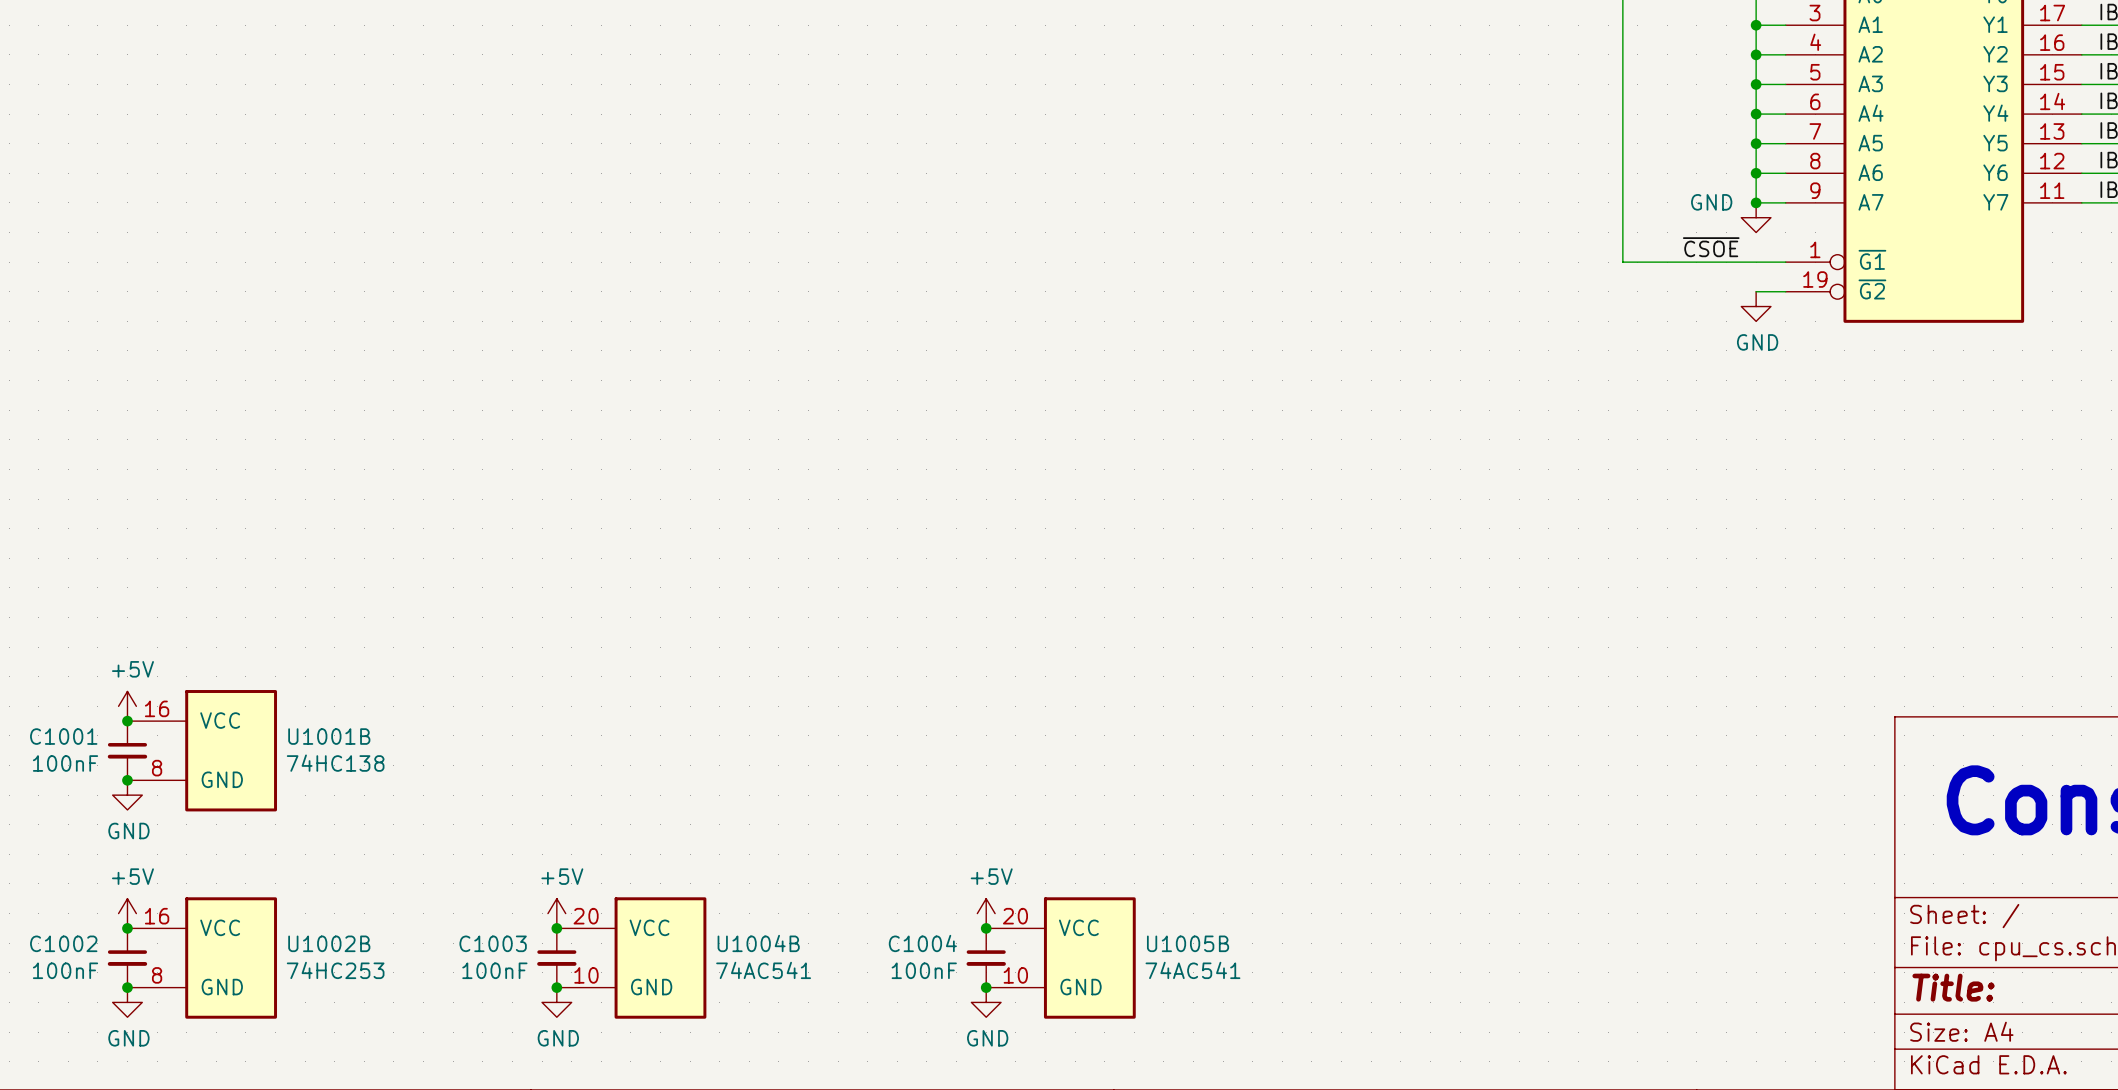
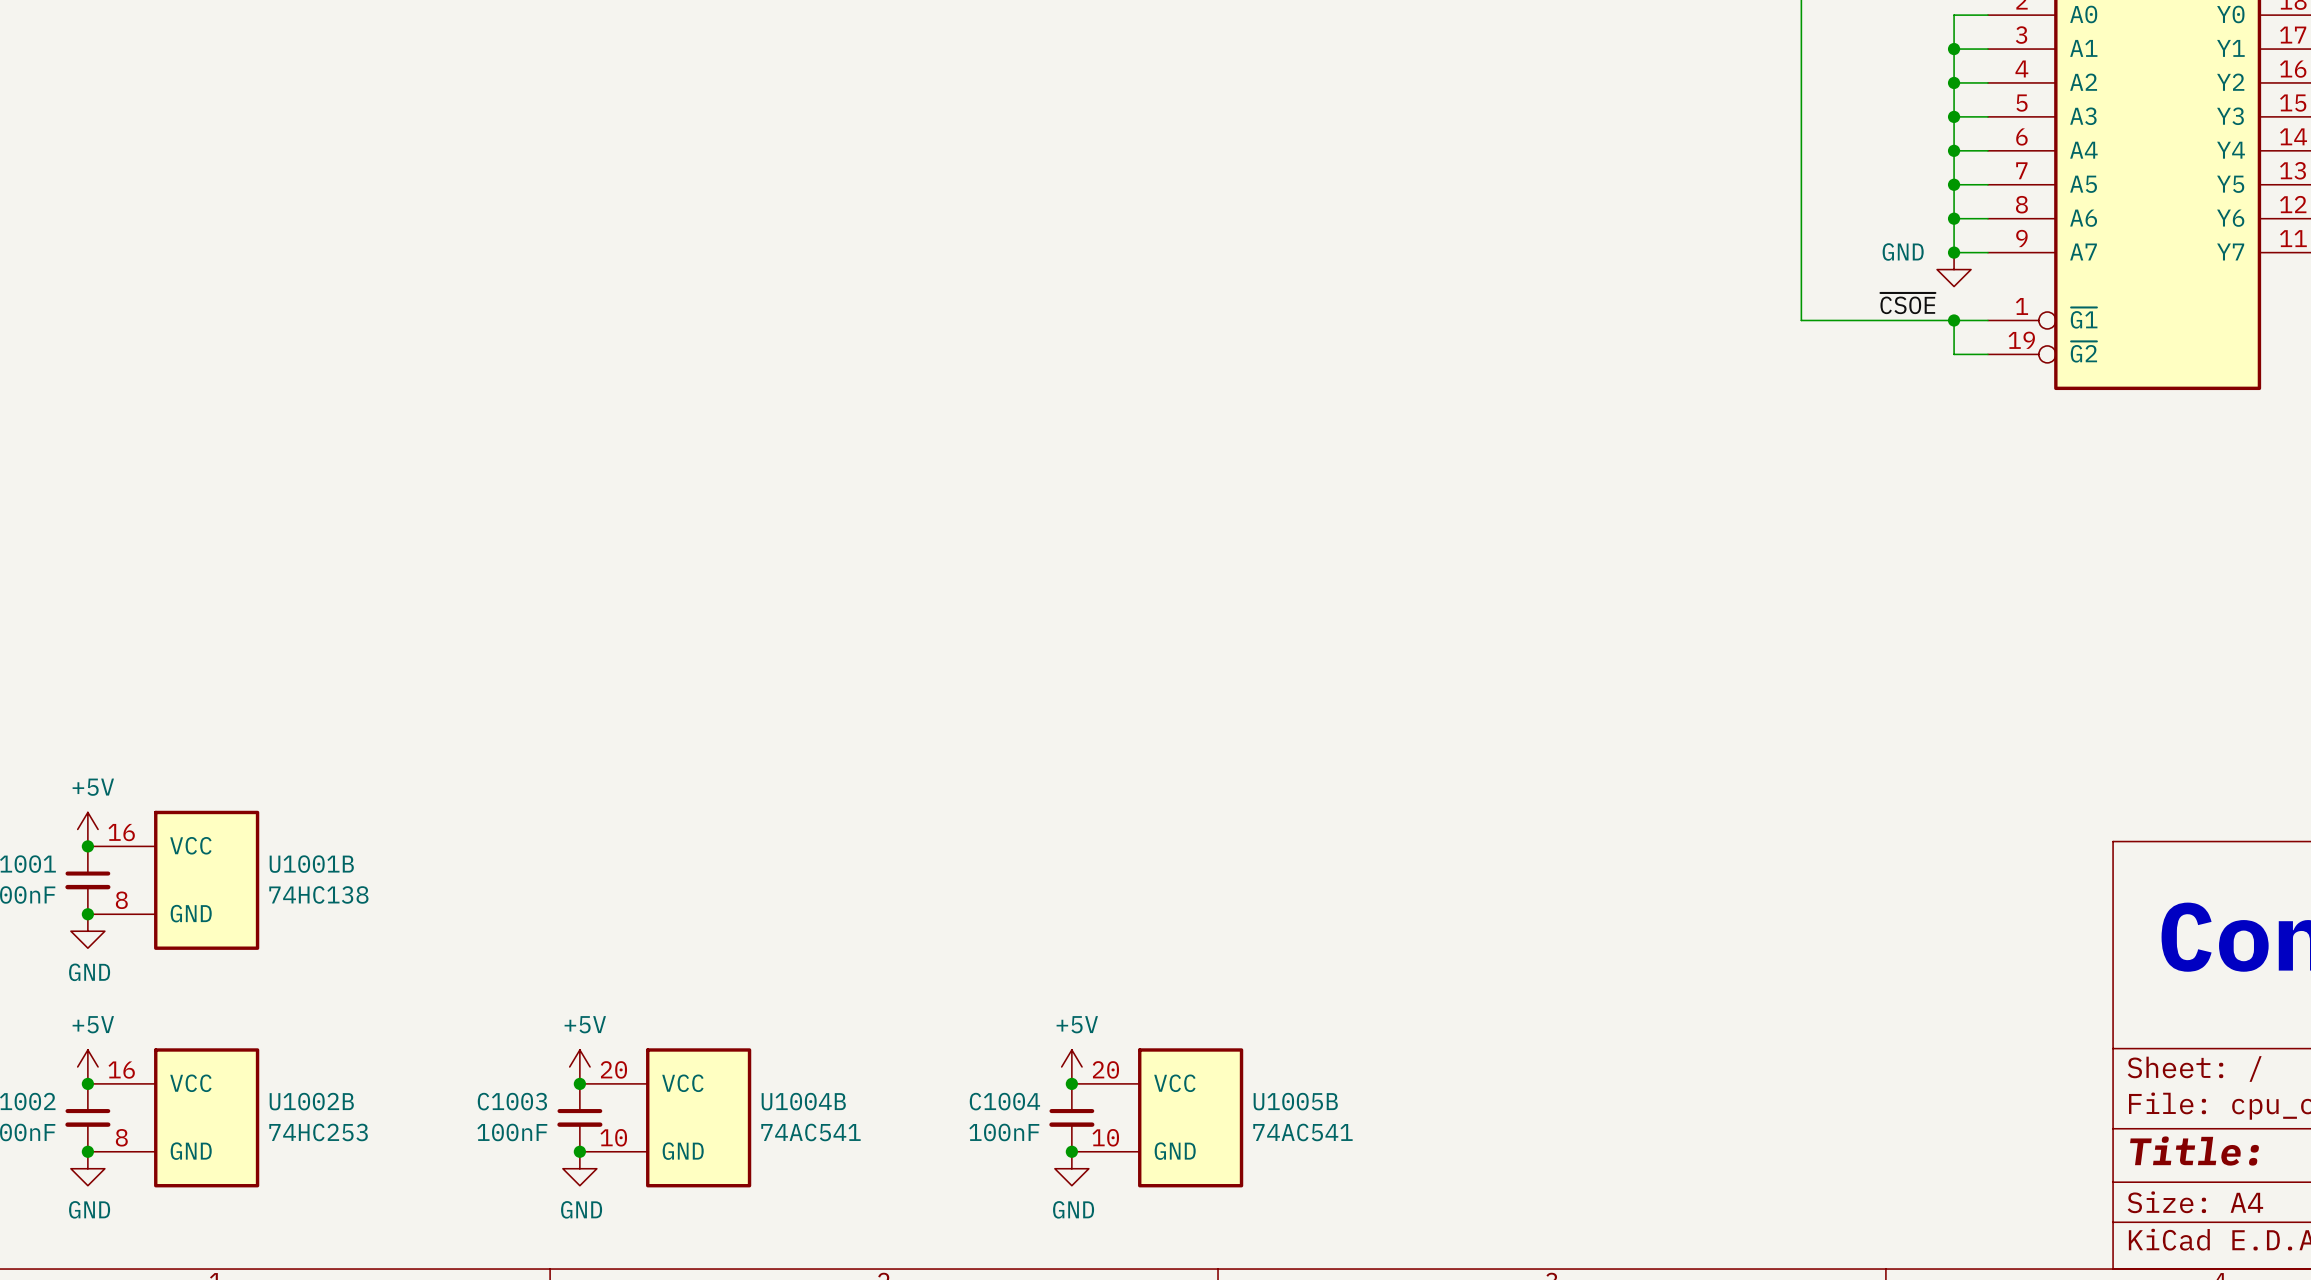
wire: none -> (1954, 320) (1954, 354)
junction: none -> (1954, 320)
power symbol: GND (1756, 306) -> none

